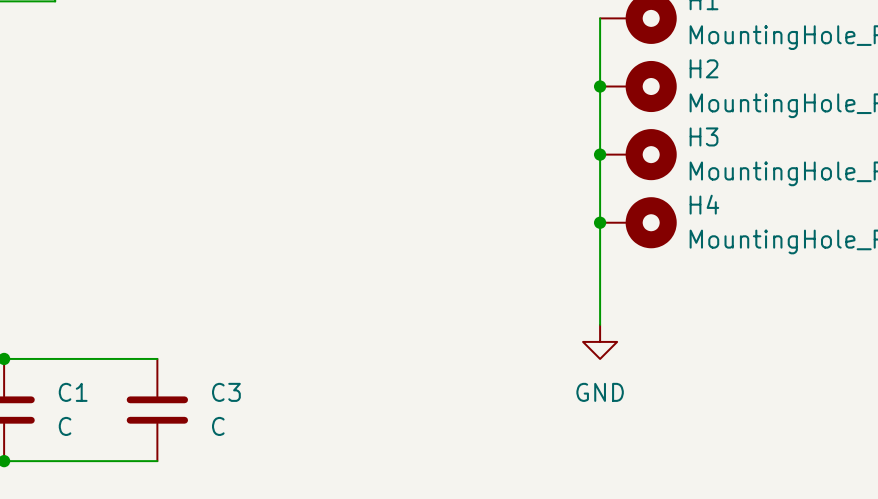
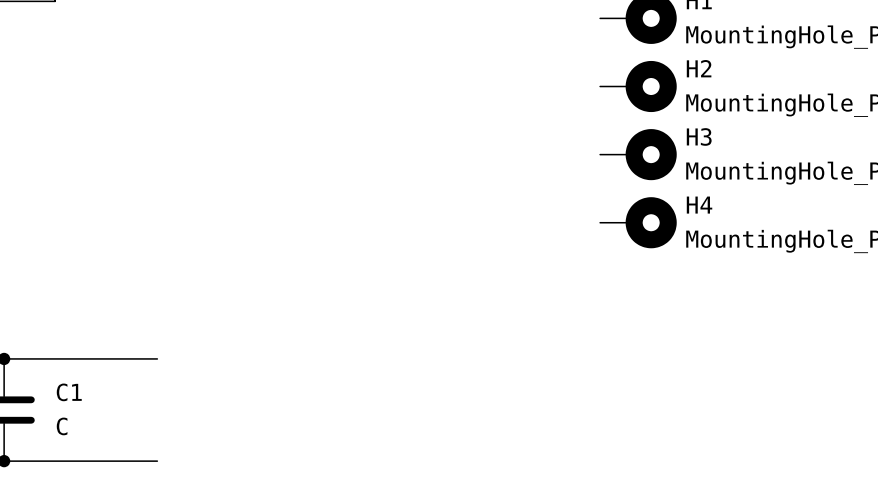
wire: (600, 18) (600, 324) -> none
junction: (600, 86) -> none
junction: (600, 154) -> none
junction: (600, 222) -> none
power symbol: GND (600, 341) -> none
C3: C (157, 410) -> none

